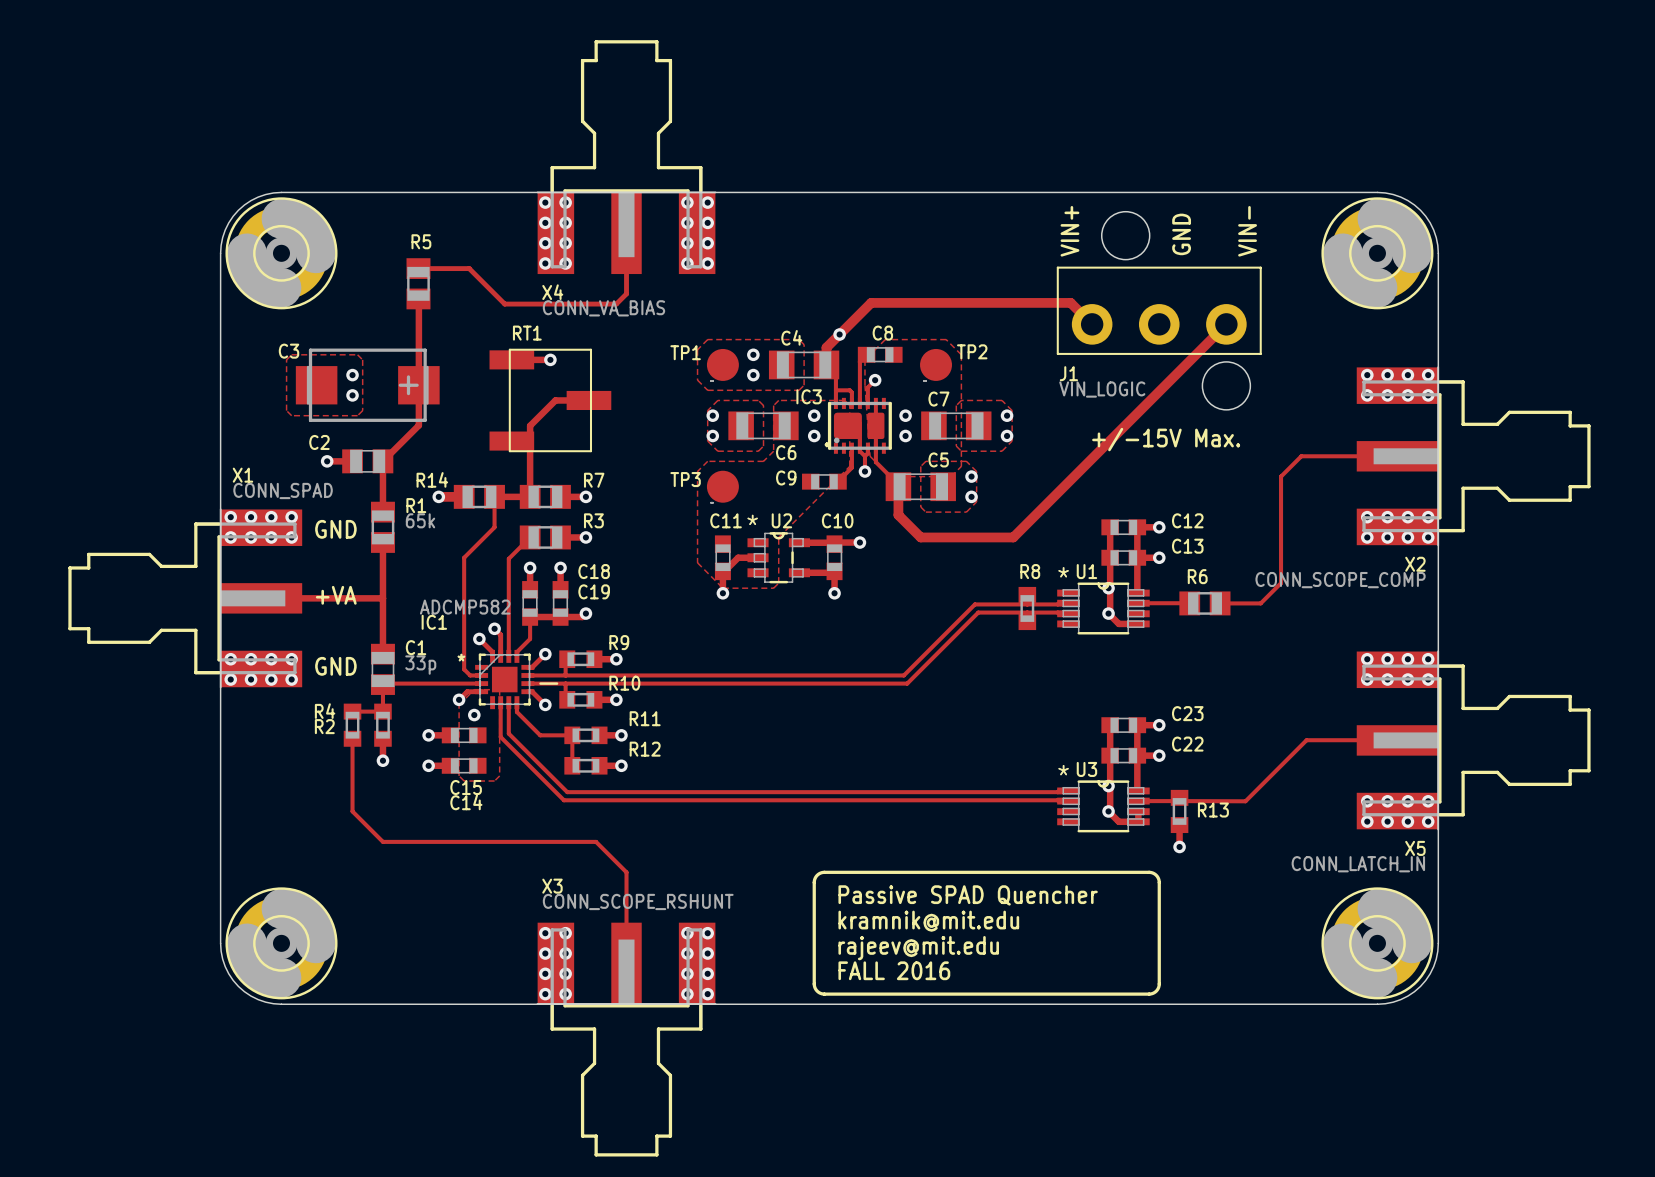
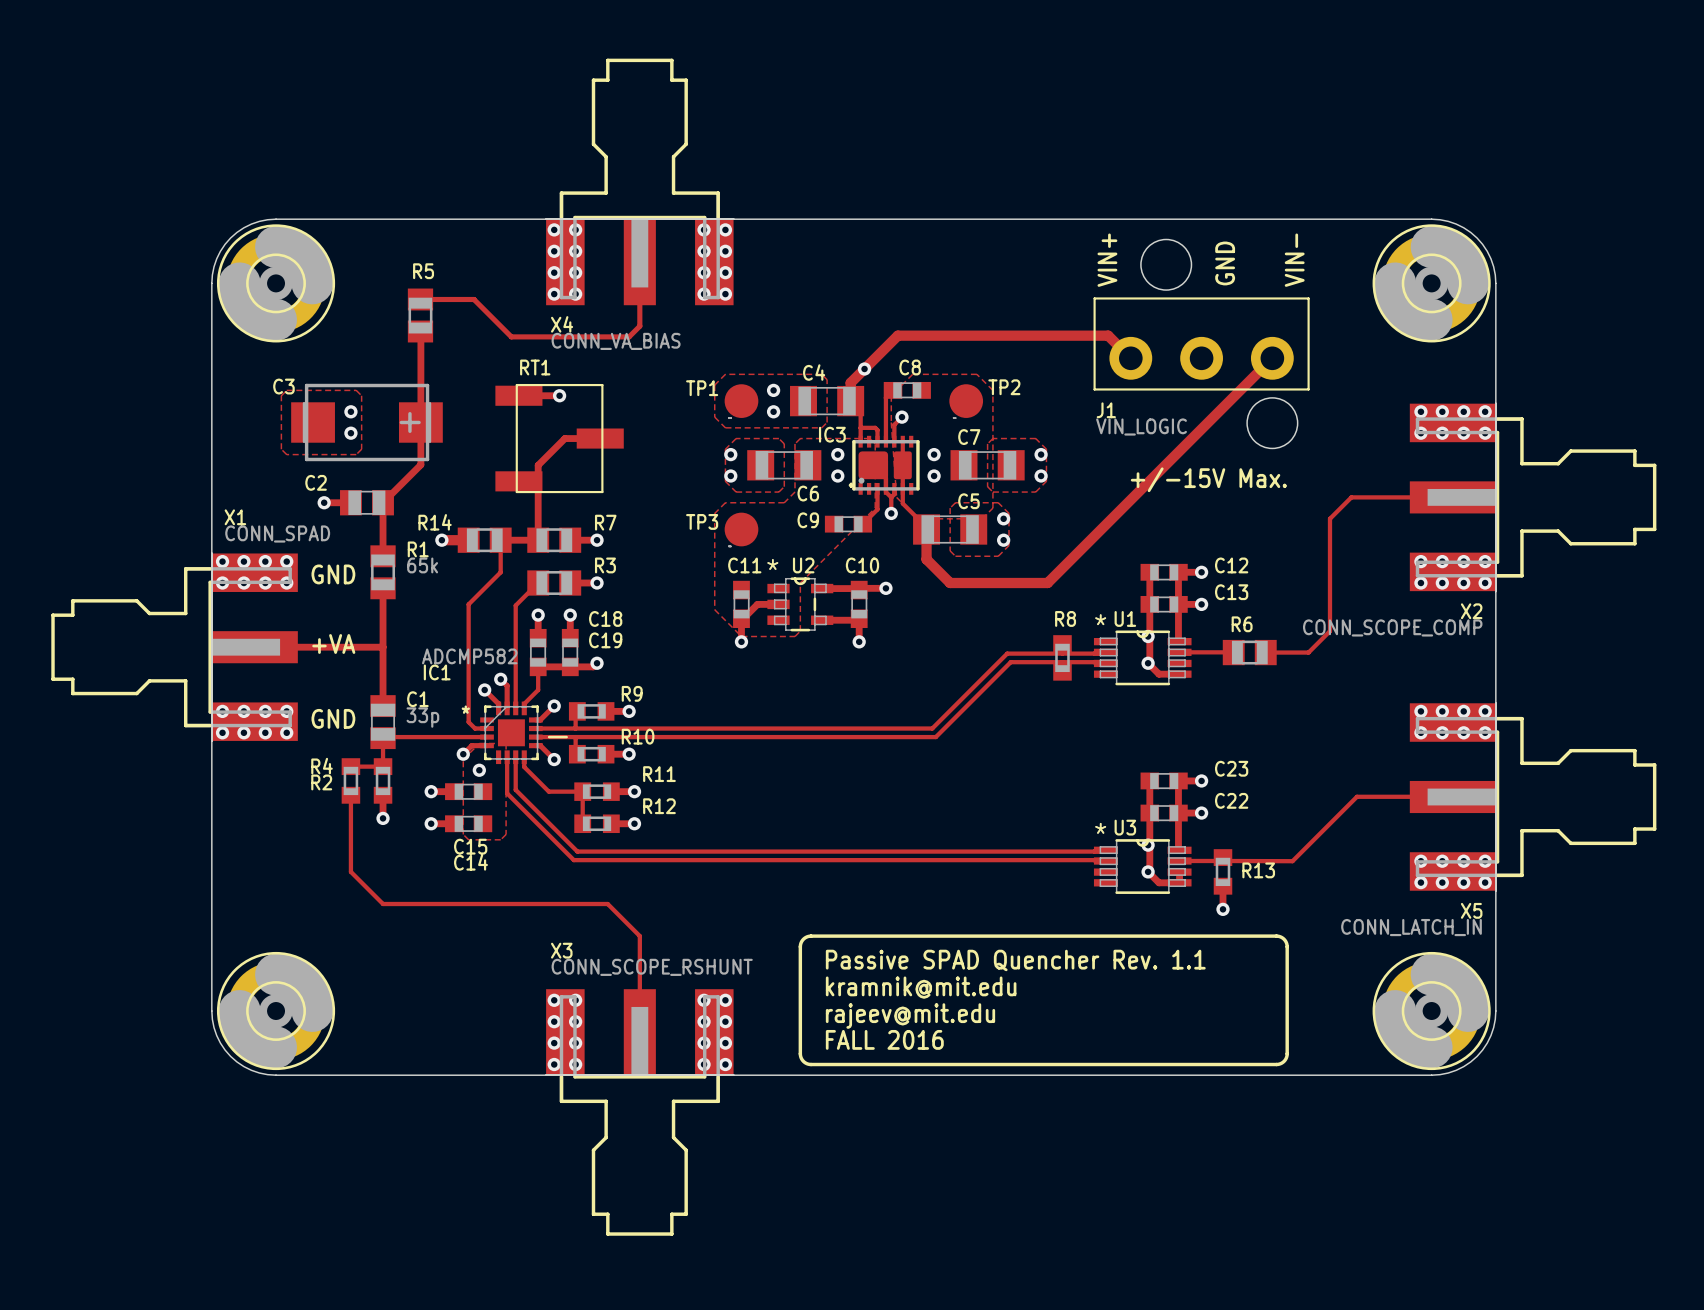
line: (824, 872) (817, 875) (814, 882) (814, 985) (818, 992) (824, 994) -> (848, 936) (808, 936) (802, 940) (800, 946) (801, 1057) (809, 1064) (848, 1064)
line: (1149, 872) (1156, 875) (1159, 882) (1159, 985) (1155, 992) (1149, 994) -> (1190, 936) (1277, 936) (1284, 940) (1287, 946) (1287, 1053) (1284, 1060) (1276, 1064) (1190, 1064)
text: Passive SPAD Quencher (968, 895) -> Passive SPAD Quencher Rev. 1.1 (1015, 960)
text position: kramnik@mit.edu (928, 921) -> kramnik@mit.edu (921, 987)
text position: rajeev@mit.edu (918, 948) -> rajeev@mit.edu (910, 1016)
text position: FALL 2016 (894, 970) -> FALL 2016 (884, 1039)

